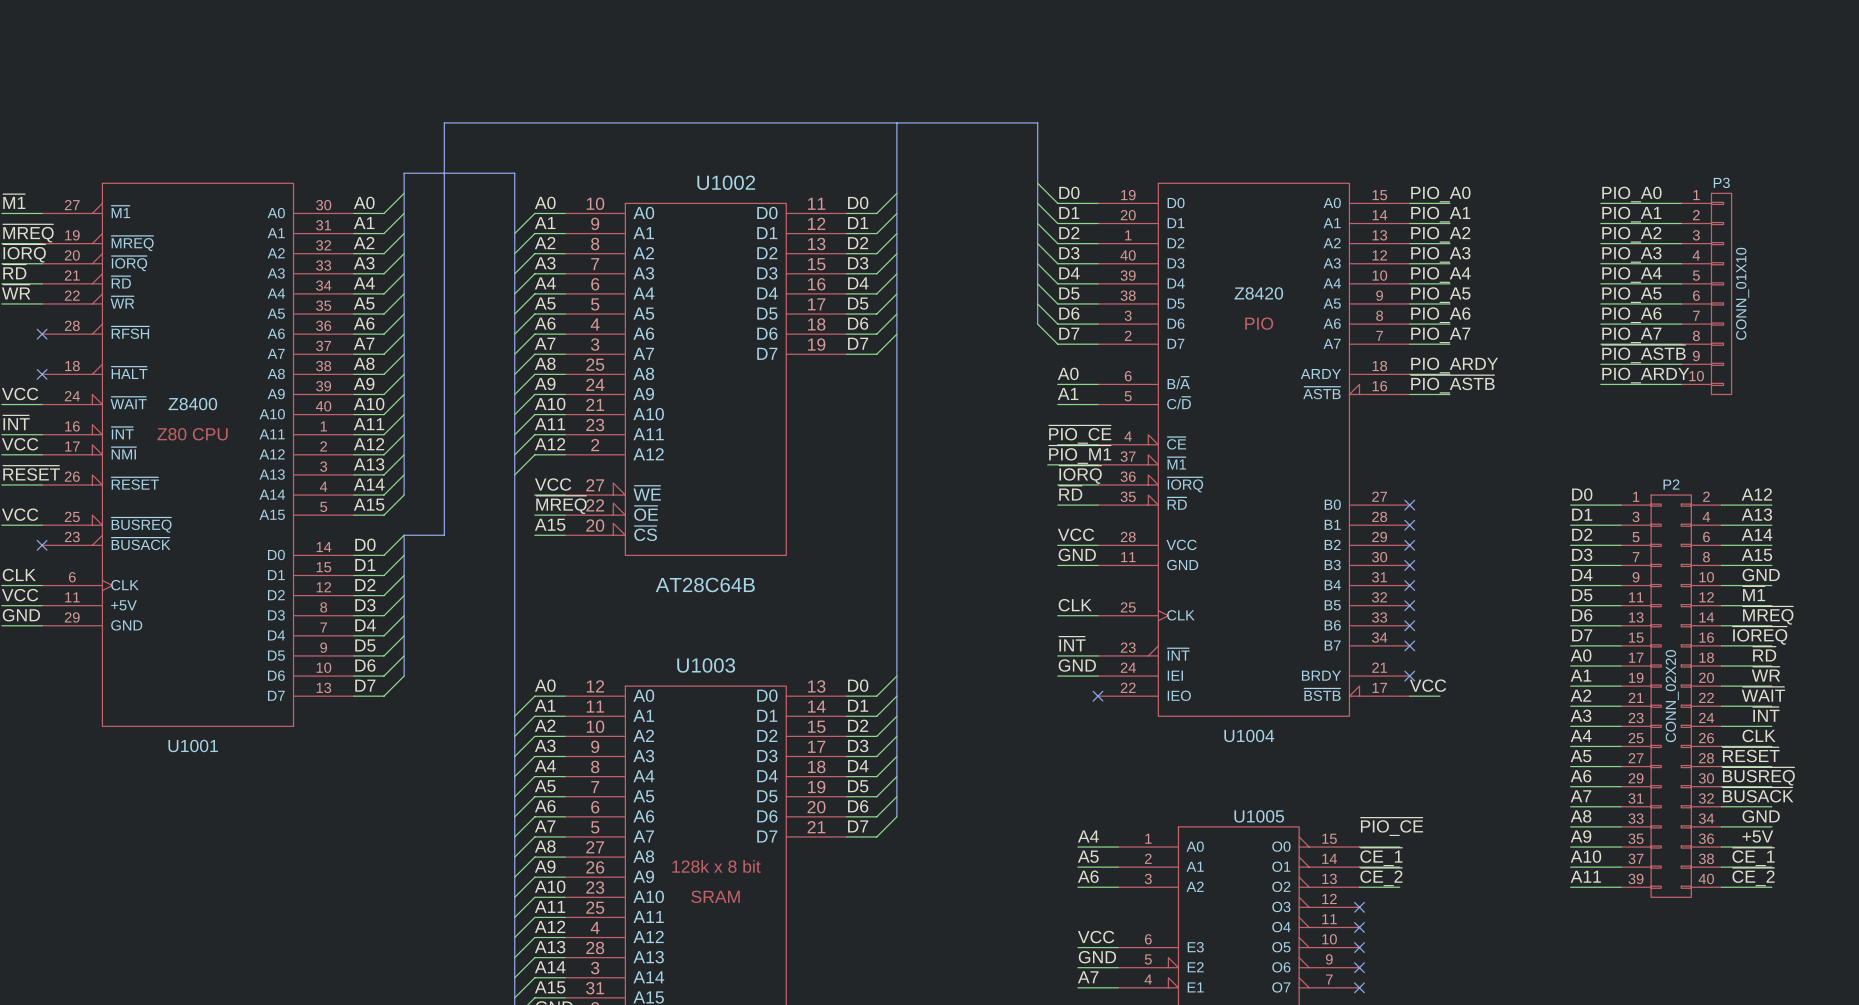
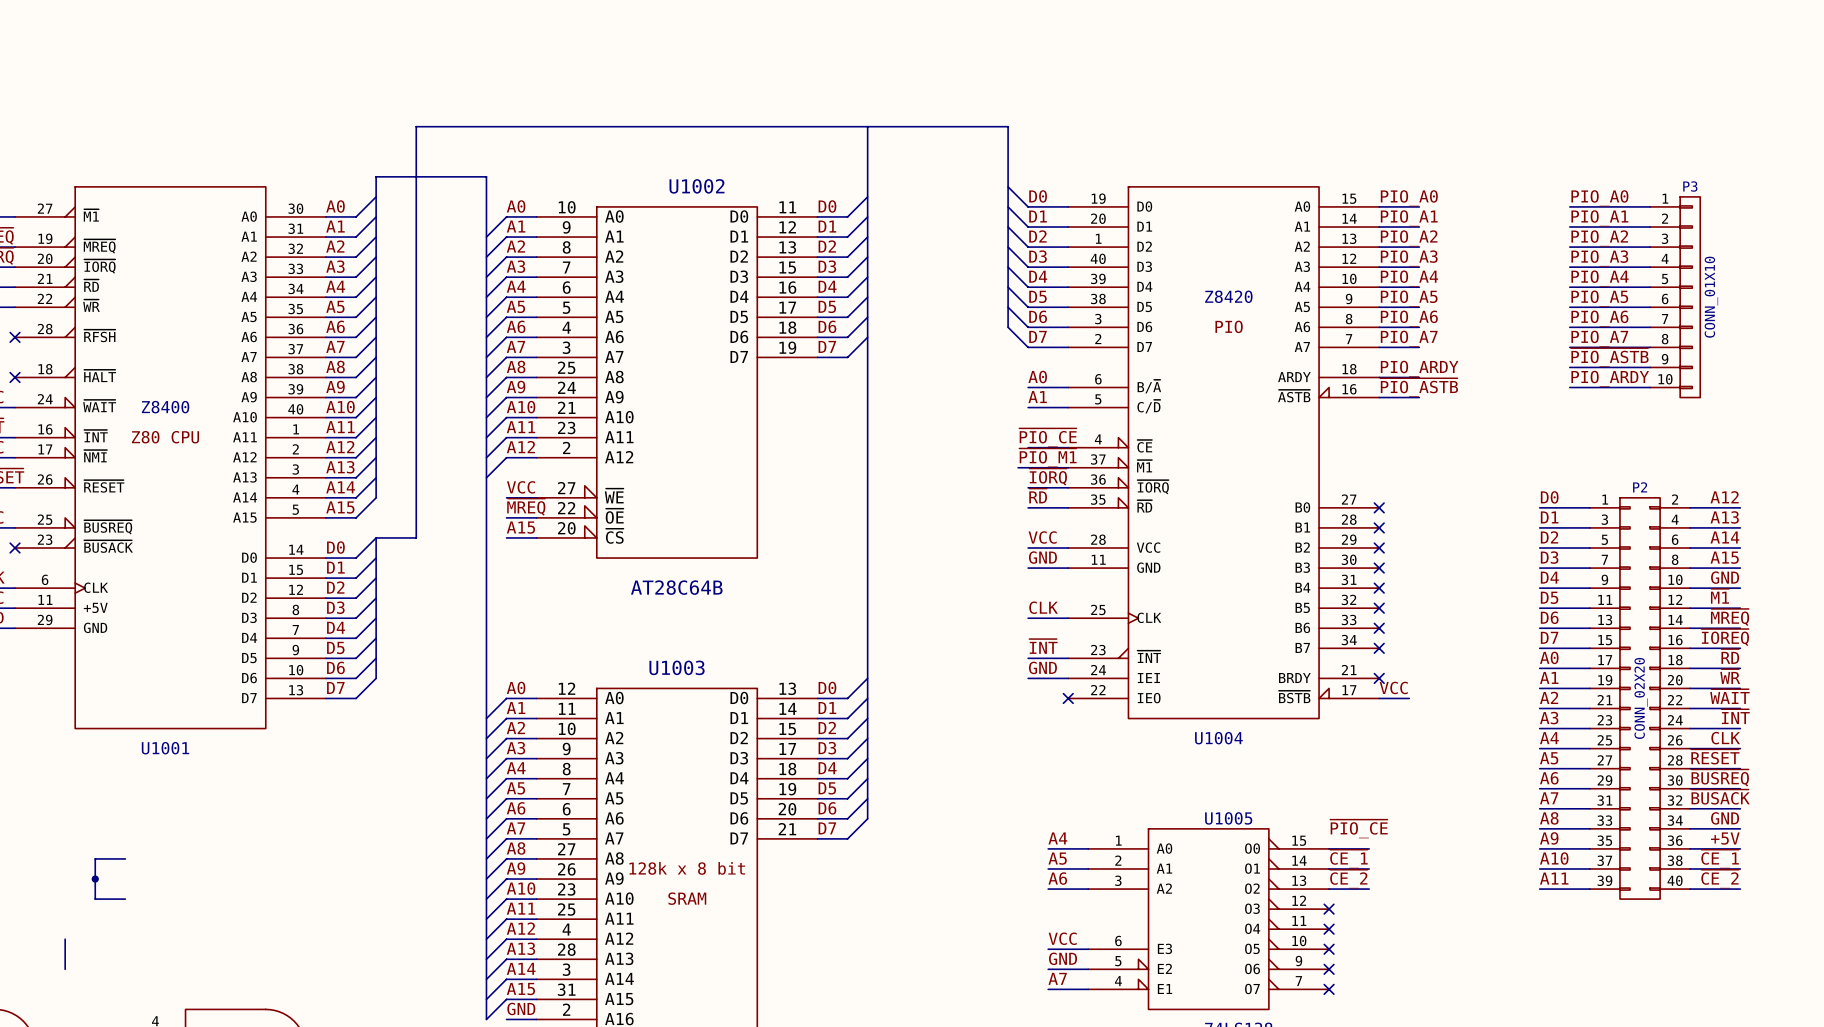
wire: none -> (125, 858) (95, 858) (95, 899) (125, 899)
junction: none -> (95, 879)
wire: none -> (65, 939) (65, 969)

